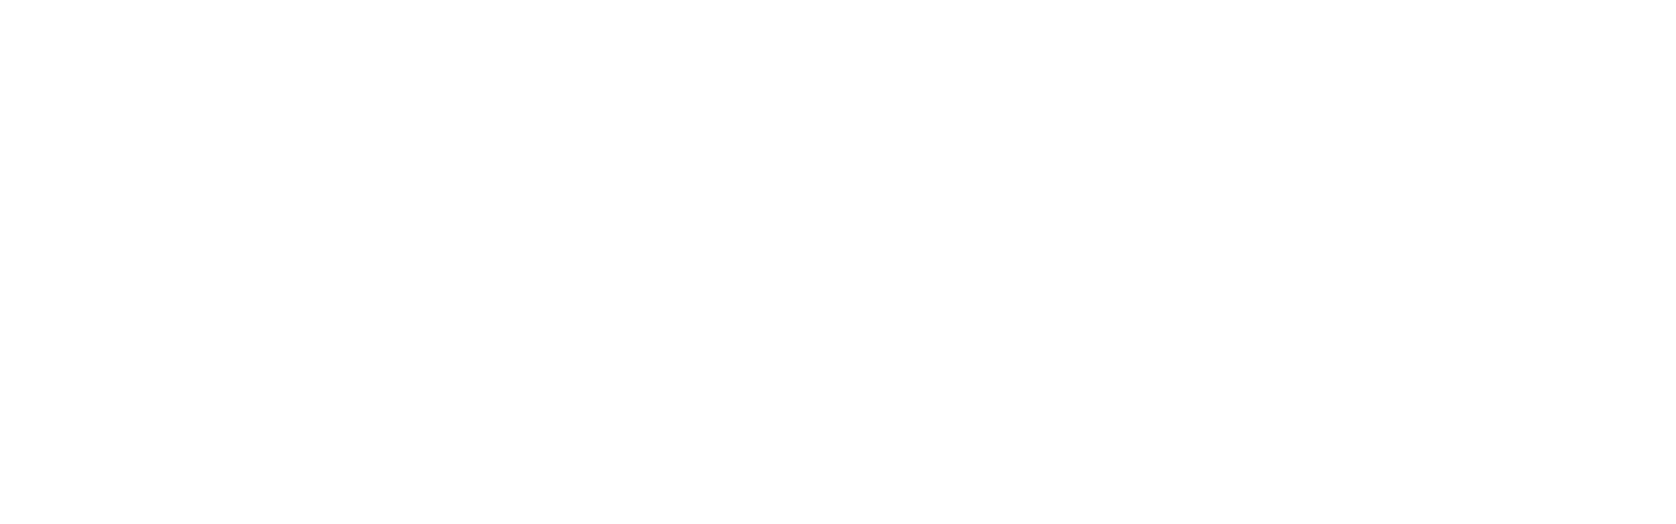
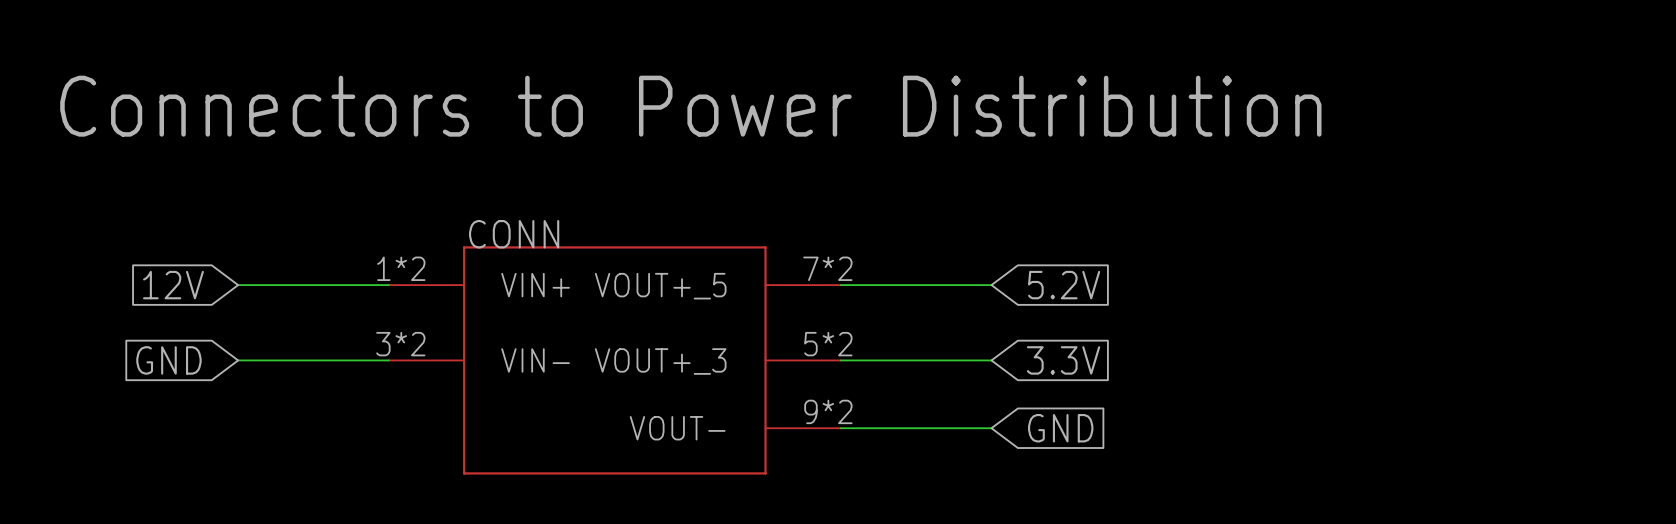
text: none -> Connectors to Power Distribution (690, 106)
global label: none -> 12V (173, 285)
wire: none -> (238, 285) (388, 285)
wire: none -> (840, 285) (991, 285)
global label: none -> 5.2V (1064, 285)
global label: none -> GND (168, 360)
wire: none -> (238, 360) (388, 360)
CONN: none -> (614, 360)
wire: none -> (840, 360) (991, 360)
global label: none -> 3.3V (1063, 360)
wire: none -> (840, 428) (991, 428)
global label: none -> GND (1060, 428)

